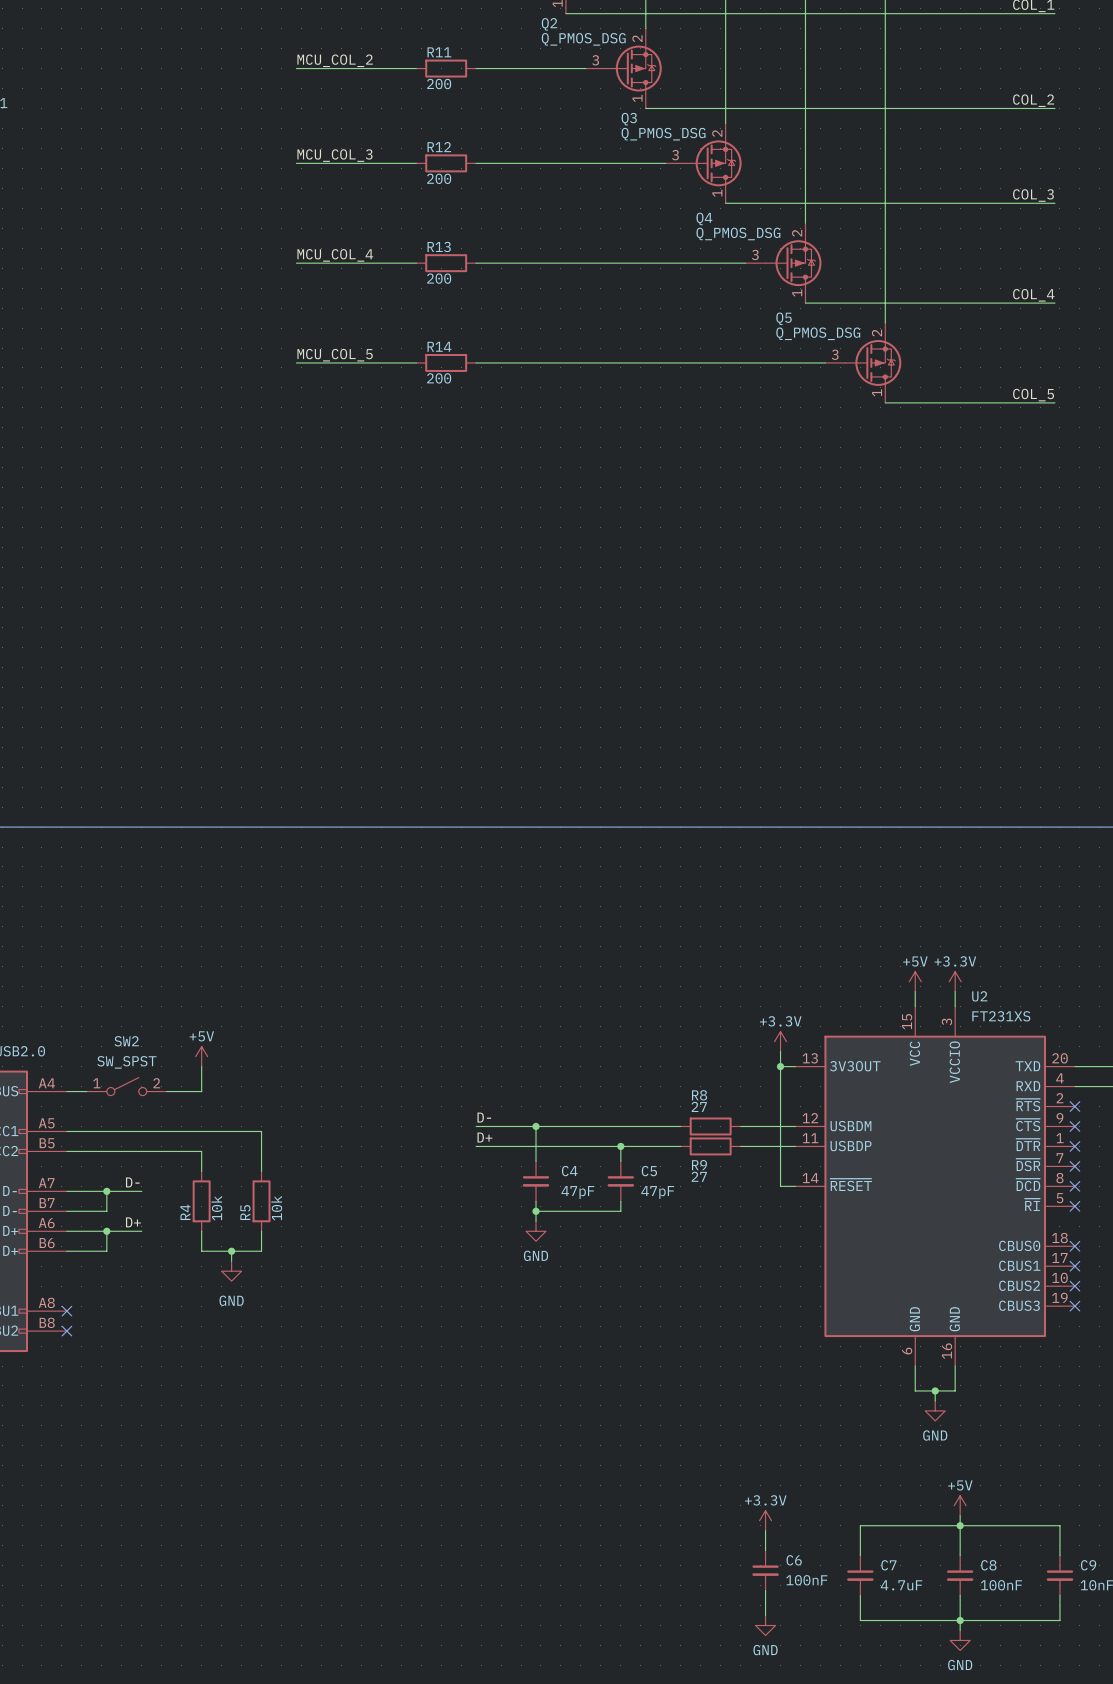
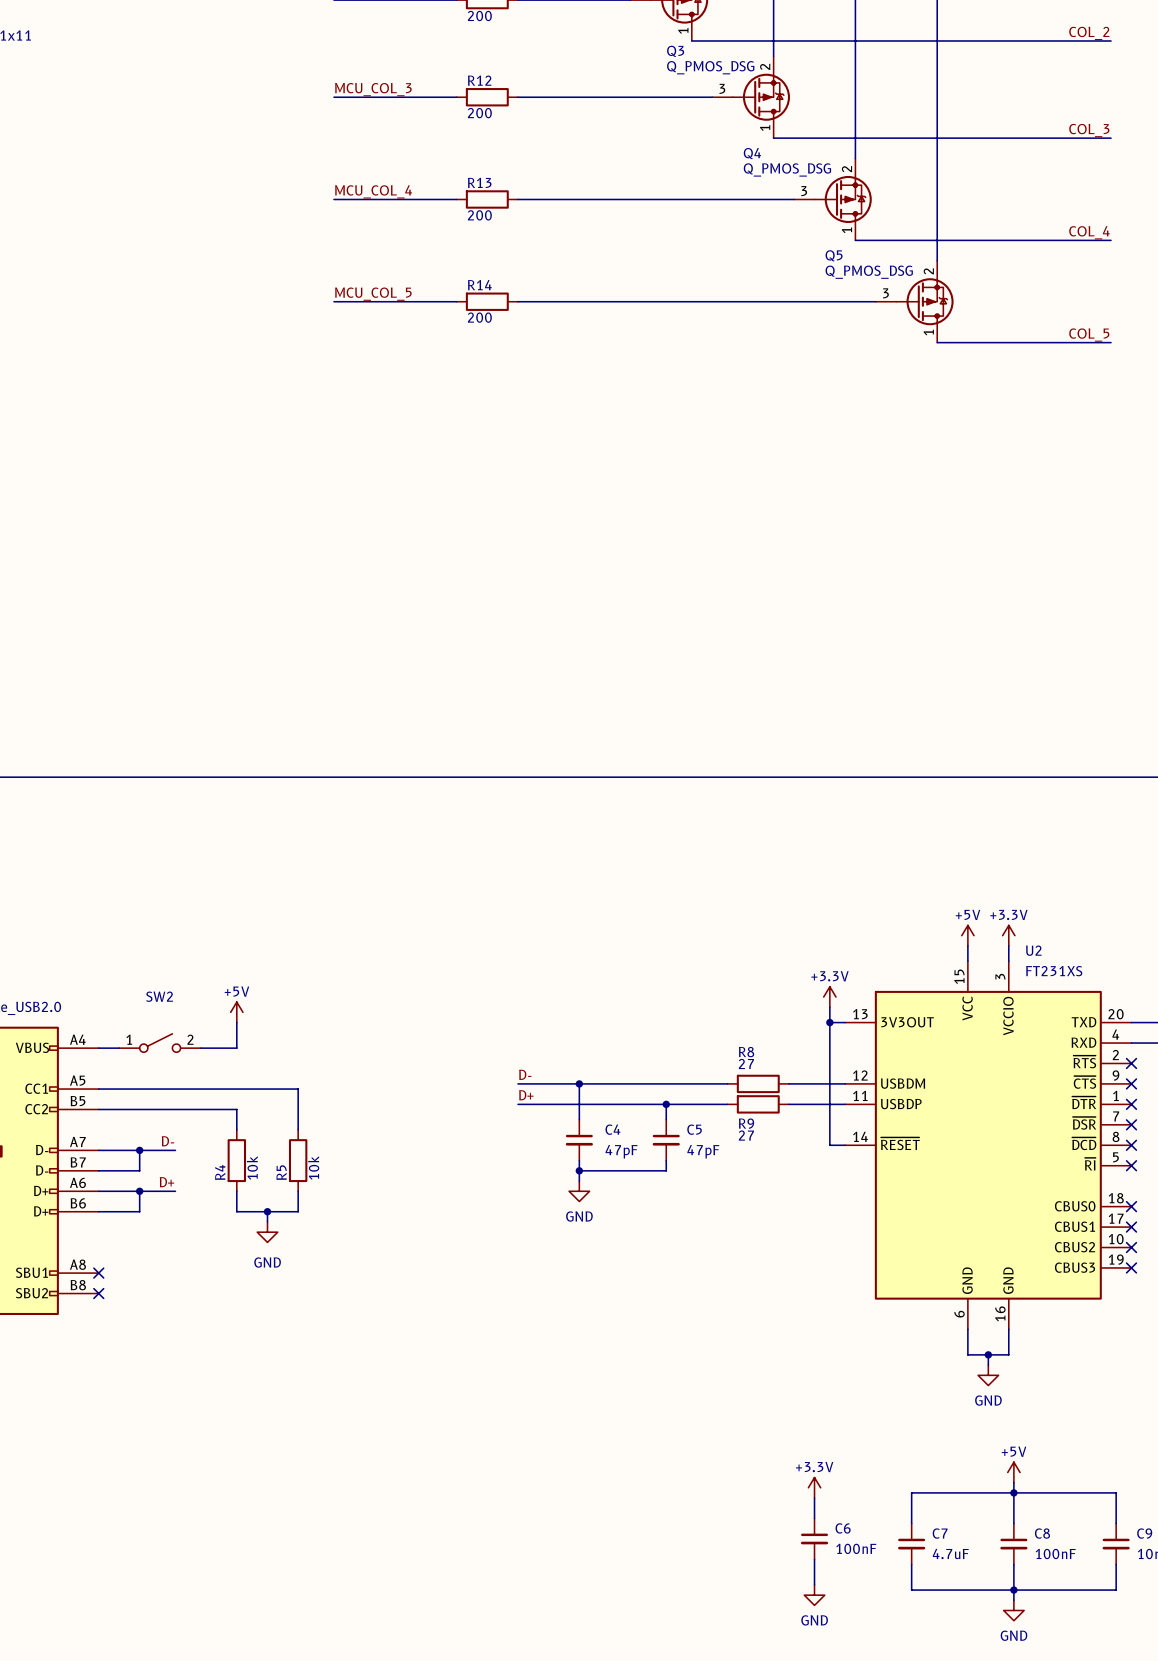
SW2 value: SW_SPST (126, 1062) -> none

